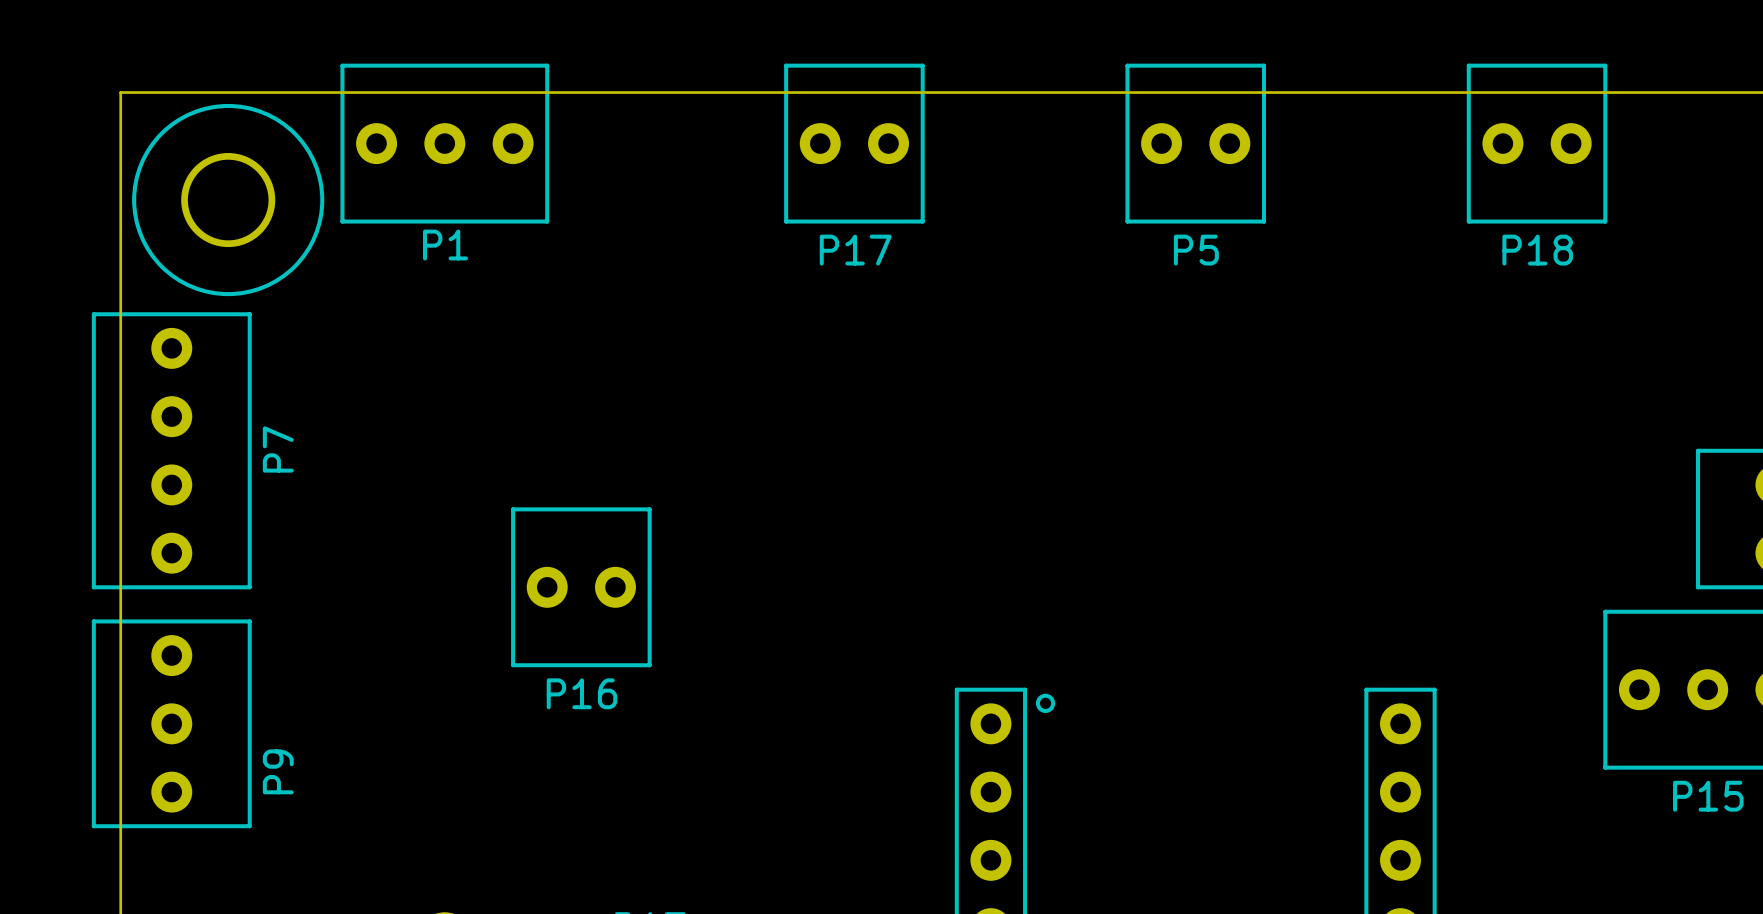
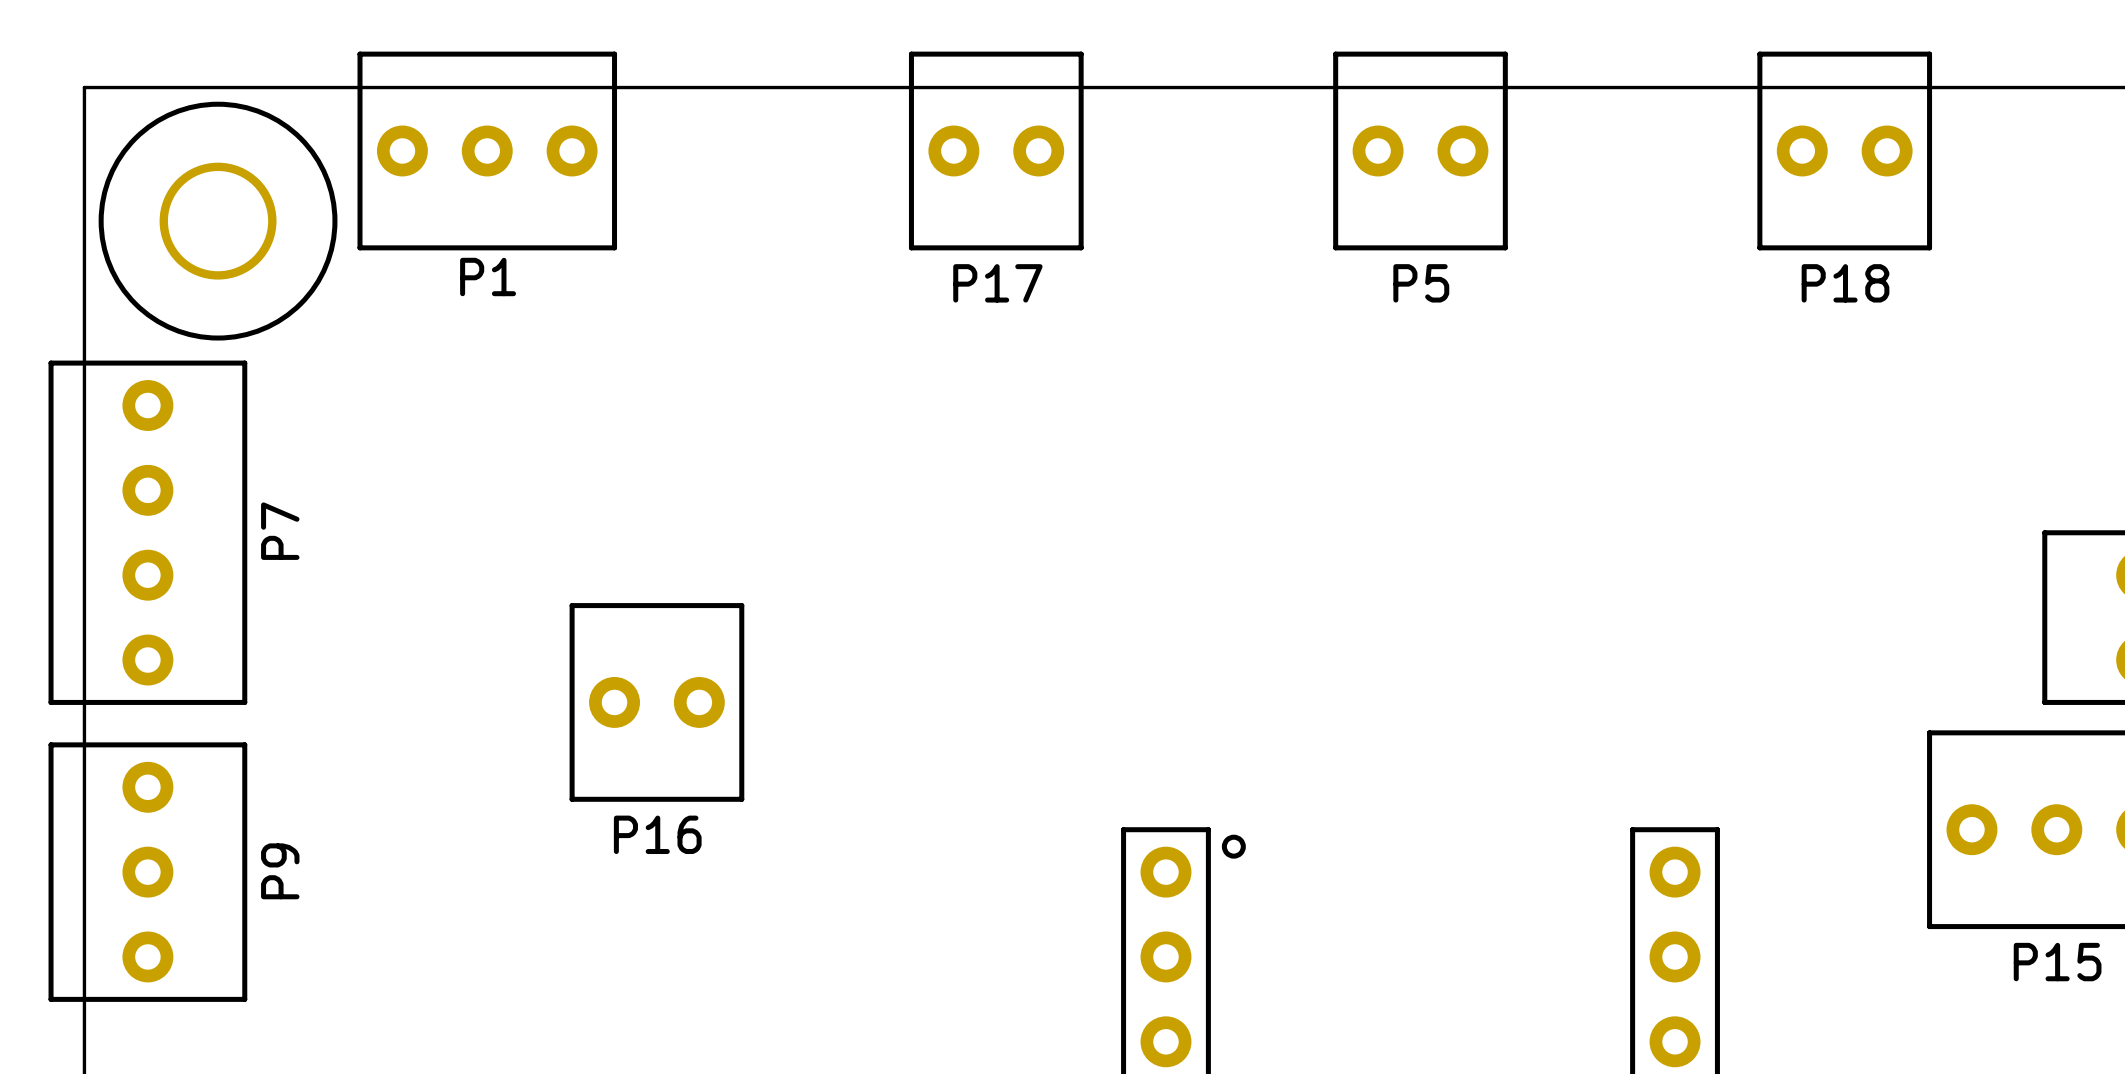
P9 name position: P9 (278, 771) -> P9 (280, 871)

